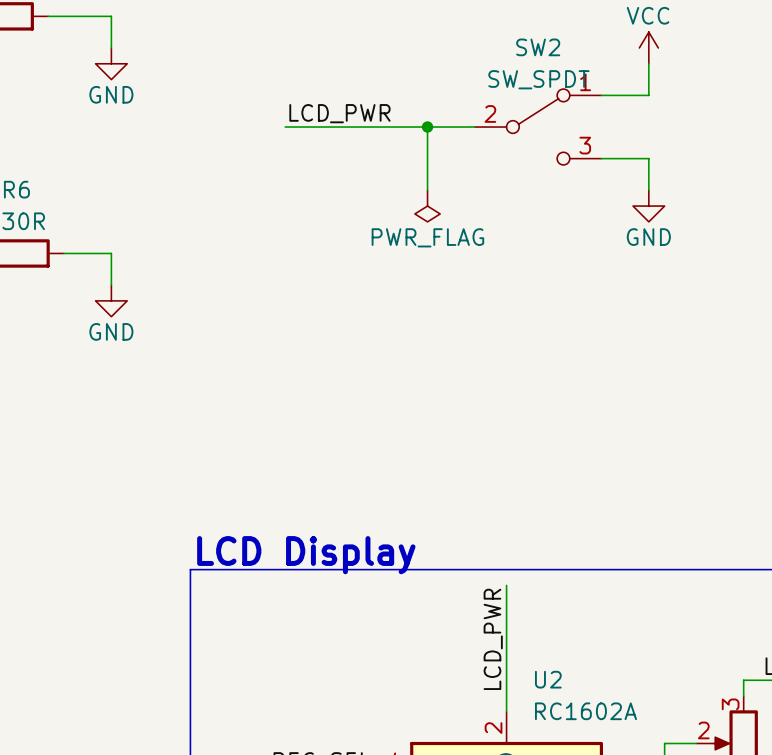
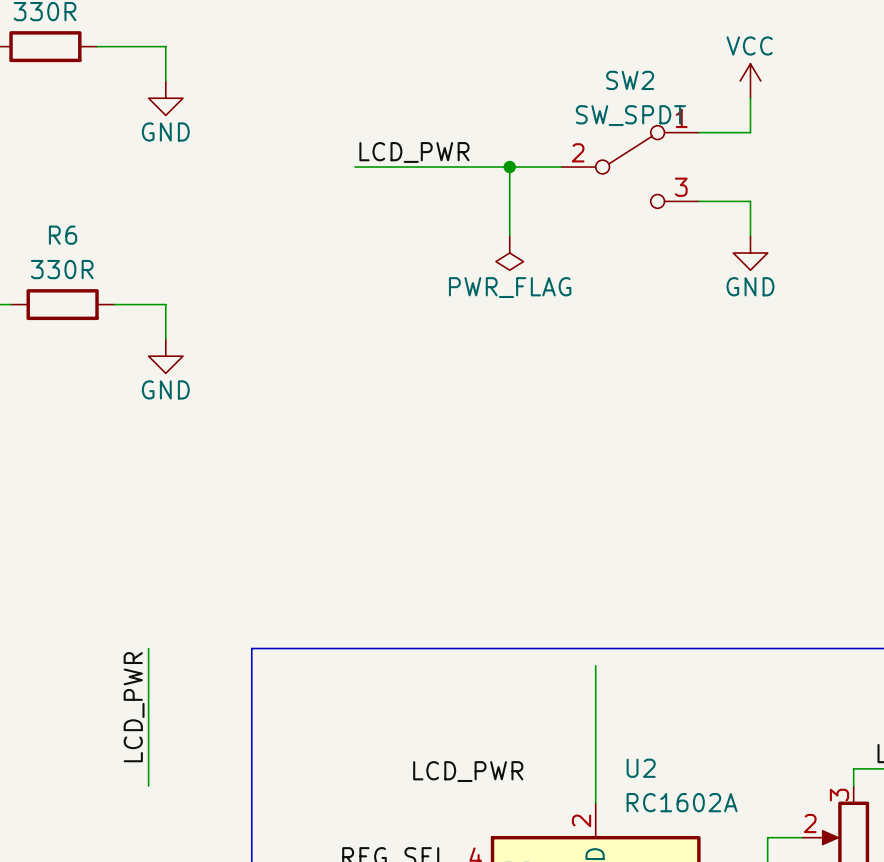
text: LCD Display (306, 555) -> none
wire: none -> (148, 648) (148, 786)
label: none -> LCD_PWR (134, 707)
label rotation: 0° (493, 639) -> 90° clockwise (468, 771)

